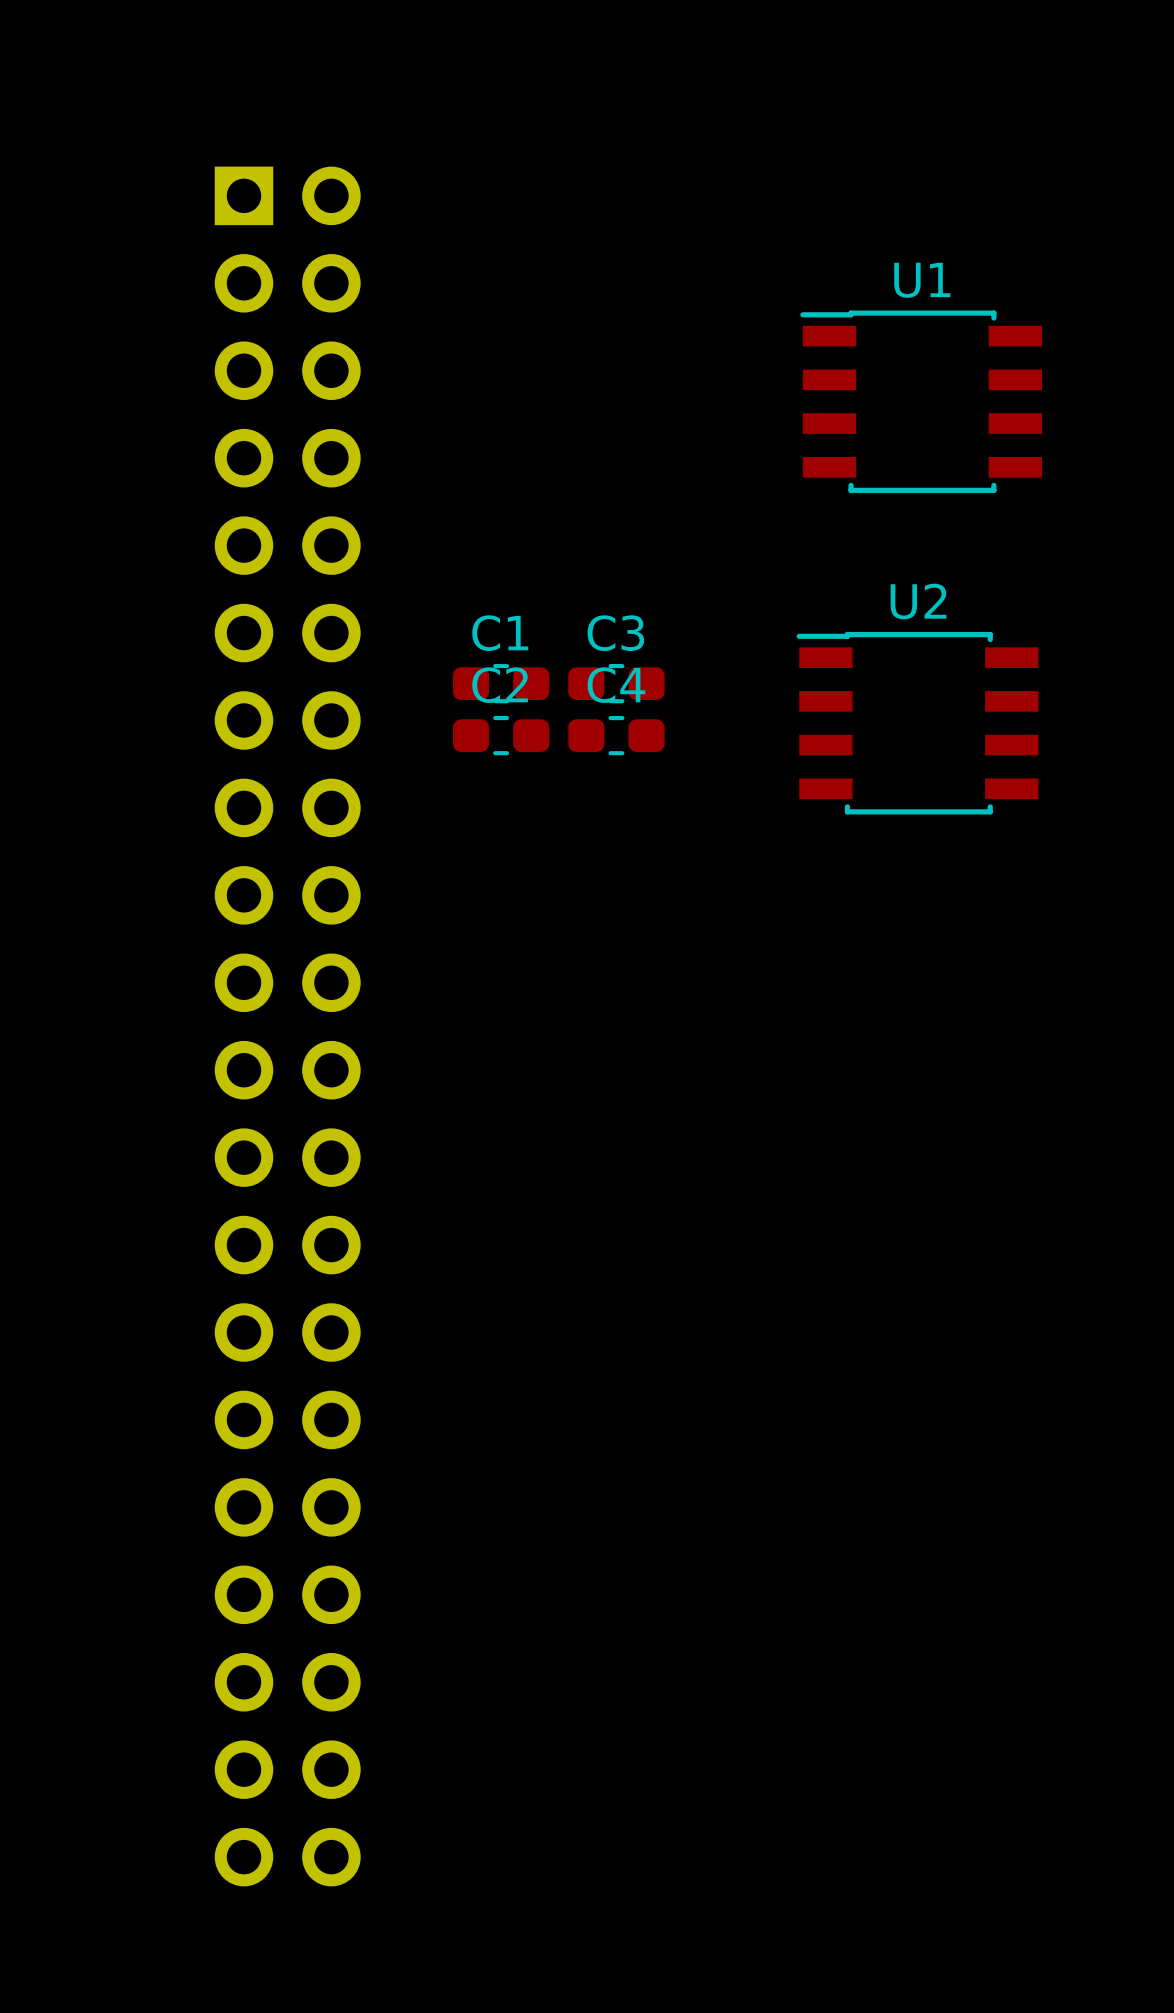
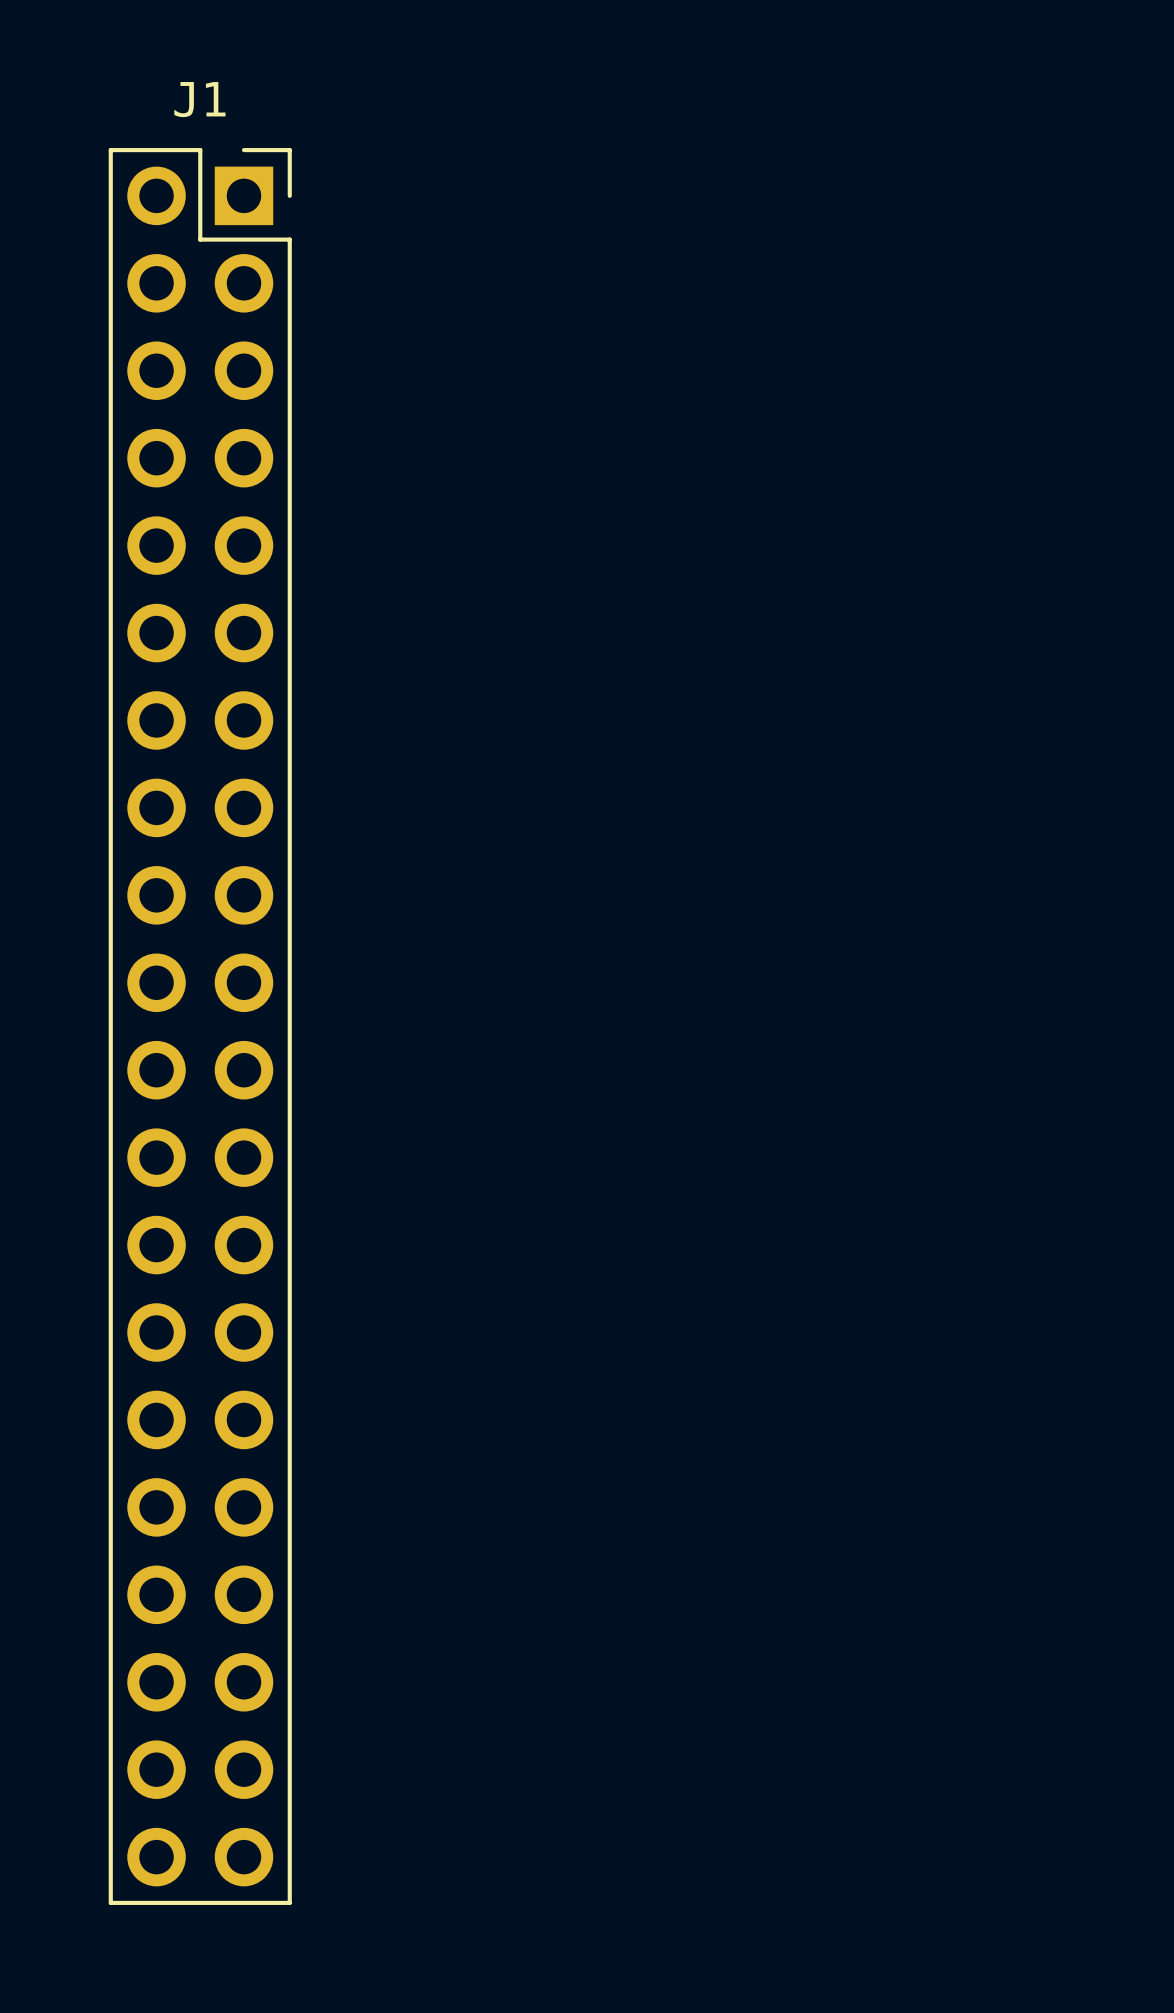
U1: (921, 401) -> none
C1: (501, 683) -> none
C3: (616, 683) -> none
U2: (917, 723) -> none
C2: (501, 735) -> none
C4: (616, 735) -> none
J1 side: bottom (287, 1026) -> top (200, 1026)

